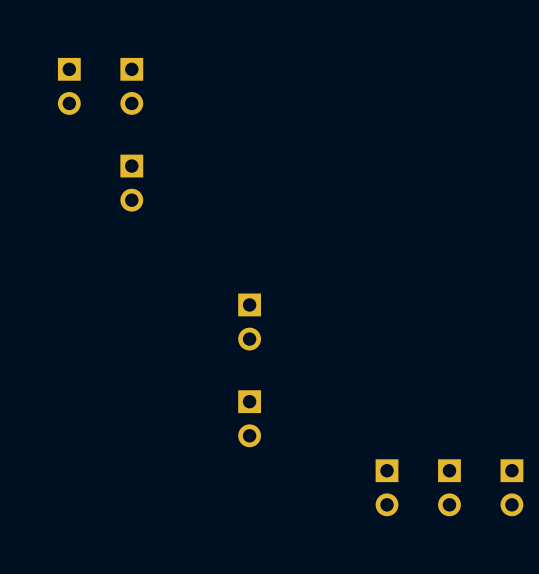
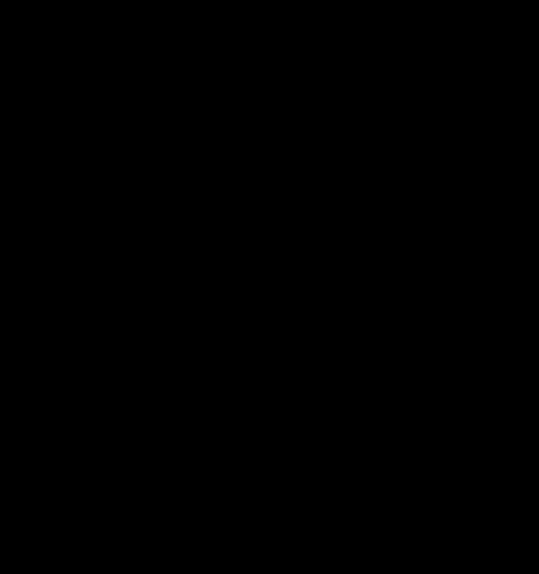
part: (69, 86) -> none
part: (131, 86) -> none
part: (131, 183) -> none
part: (249, 322) -> none
part: (249, 418) -> none
part: (387, 487) -> none
part: (449, 487) -> none
part: (511, 487) -> none

